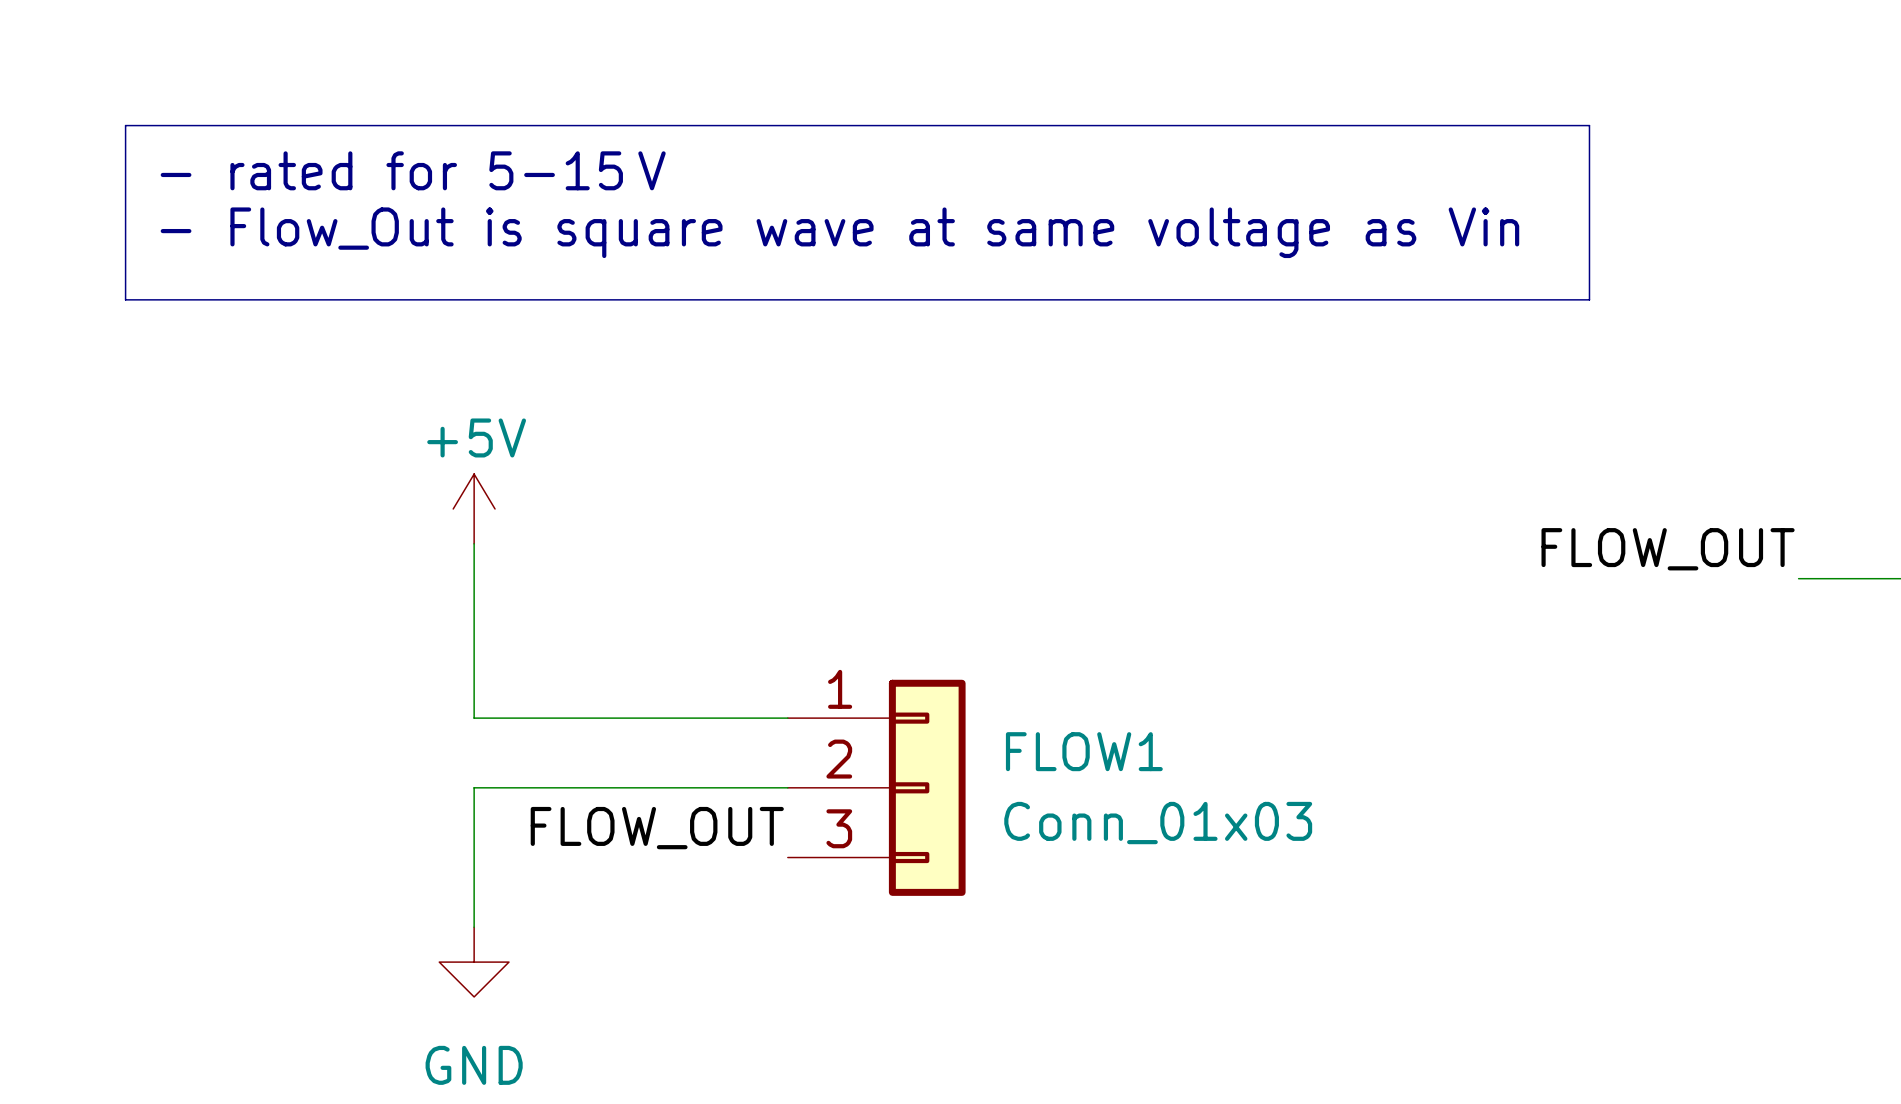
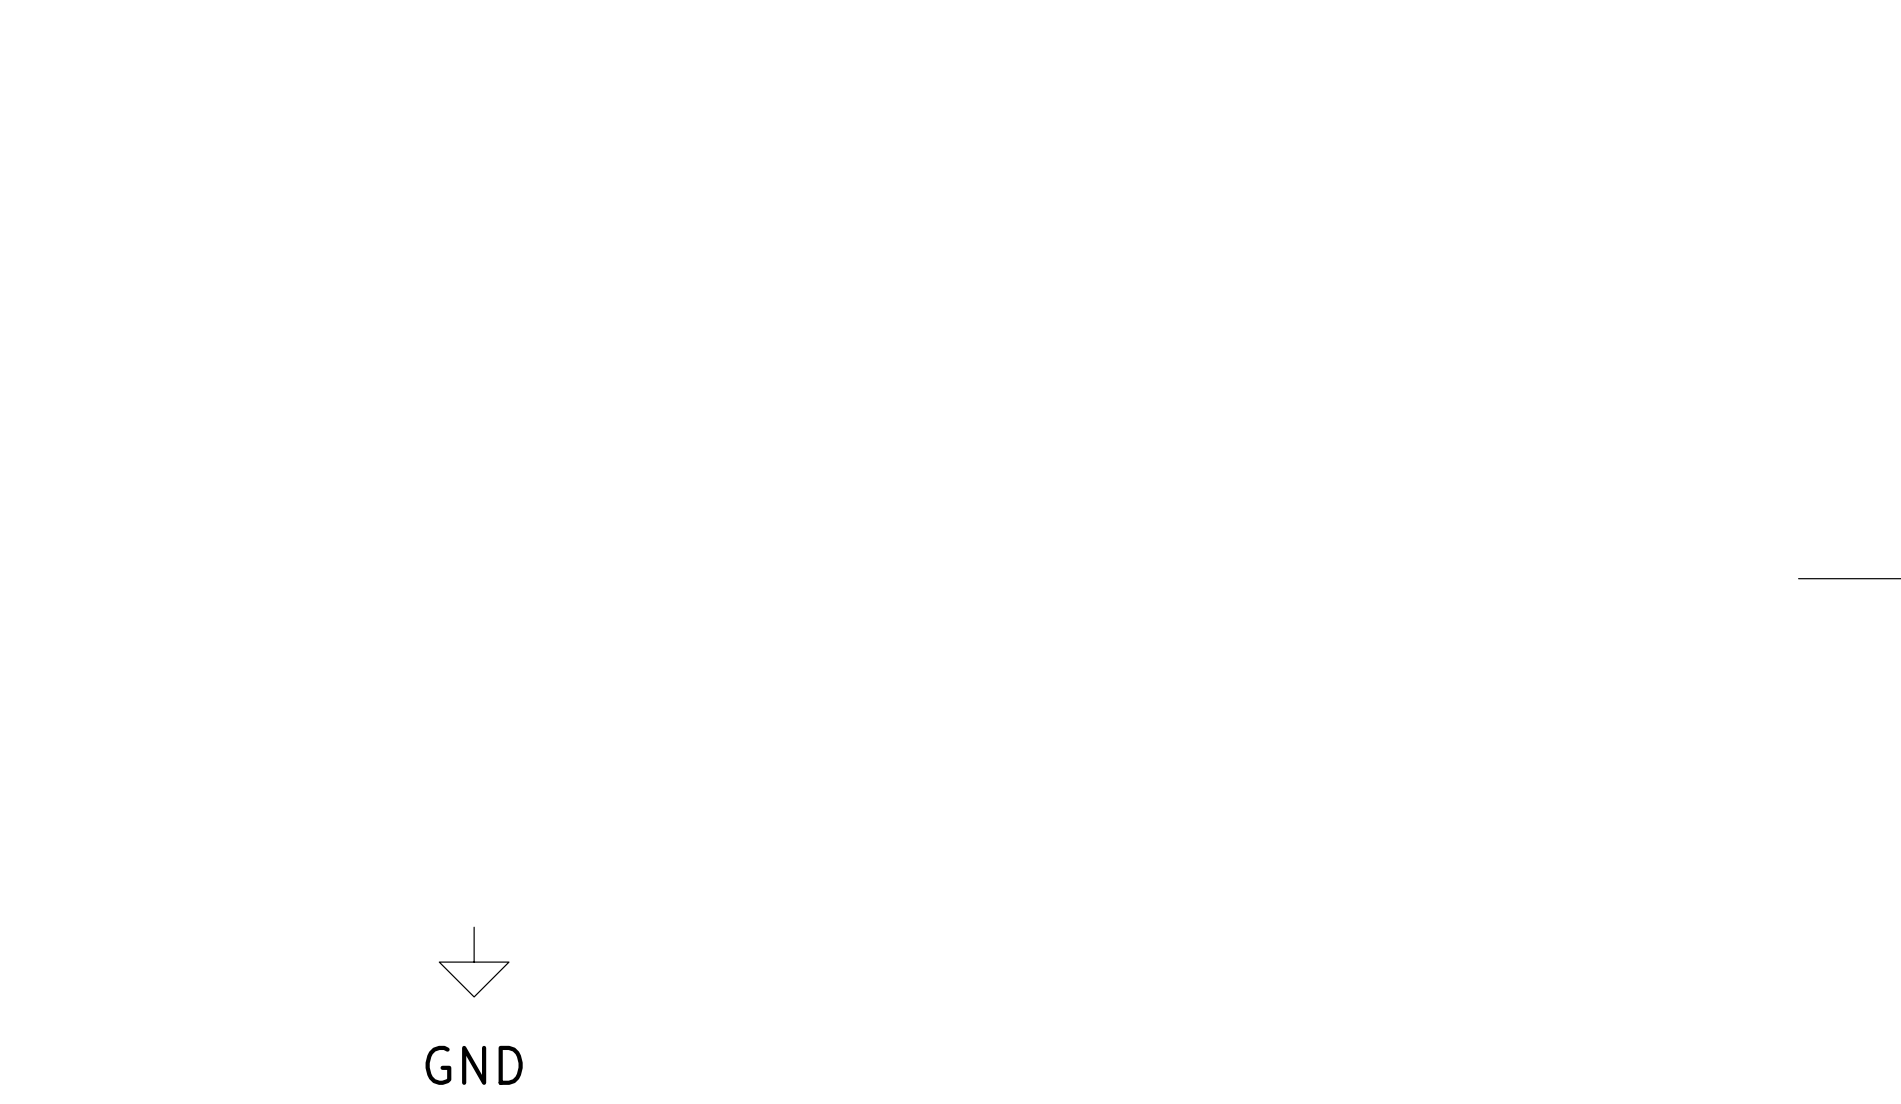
line: (125, 125) (1589, 125) (1589, 299) (125, 299) (125, 125) -> none
text: - rated for 5-15 V (413, 170) -> none
text: - Flow_Out is square wave at same voltage as Vin (839, 232) -> none
power symbol: +5V (474, 508) -> none
wire: (474, 543) (474, 718) (787, 718) -> none
label: FLOW_OUT (1668, 549) -> none
wire: (787, 787) (474, 787) (474, 927) -> none
FLOW1: Conn_01x03 (876, 787) -> none
label: FLOW_OUT (657, 828) -> none

